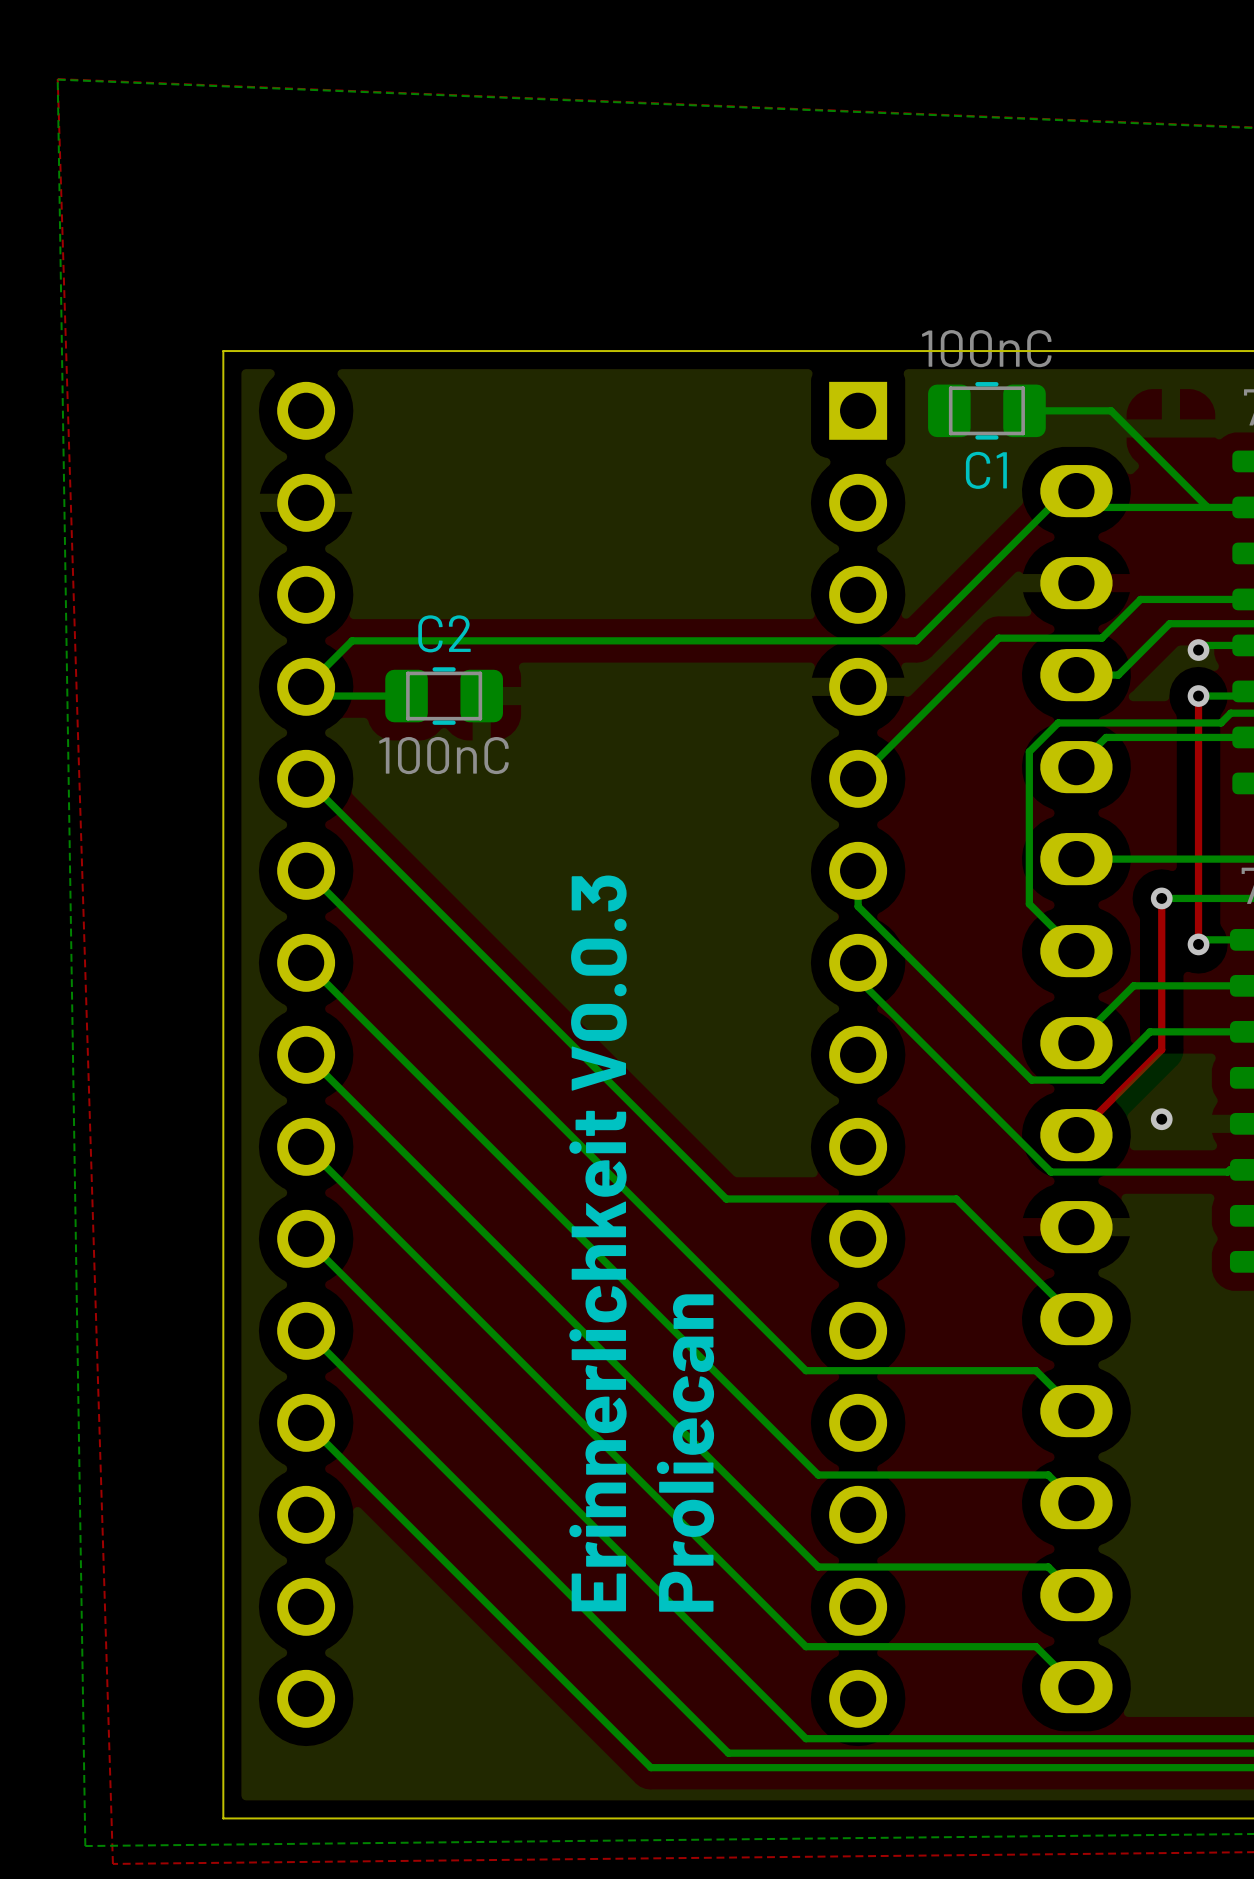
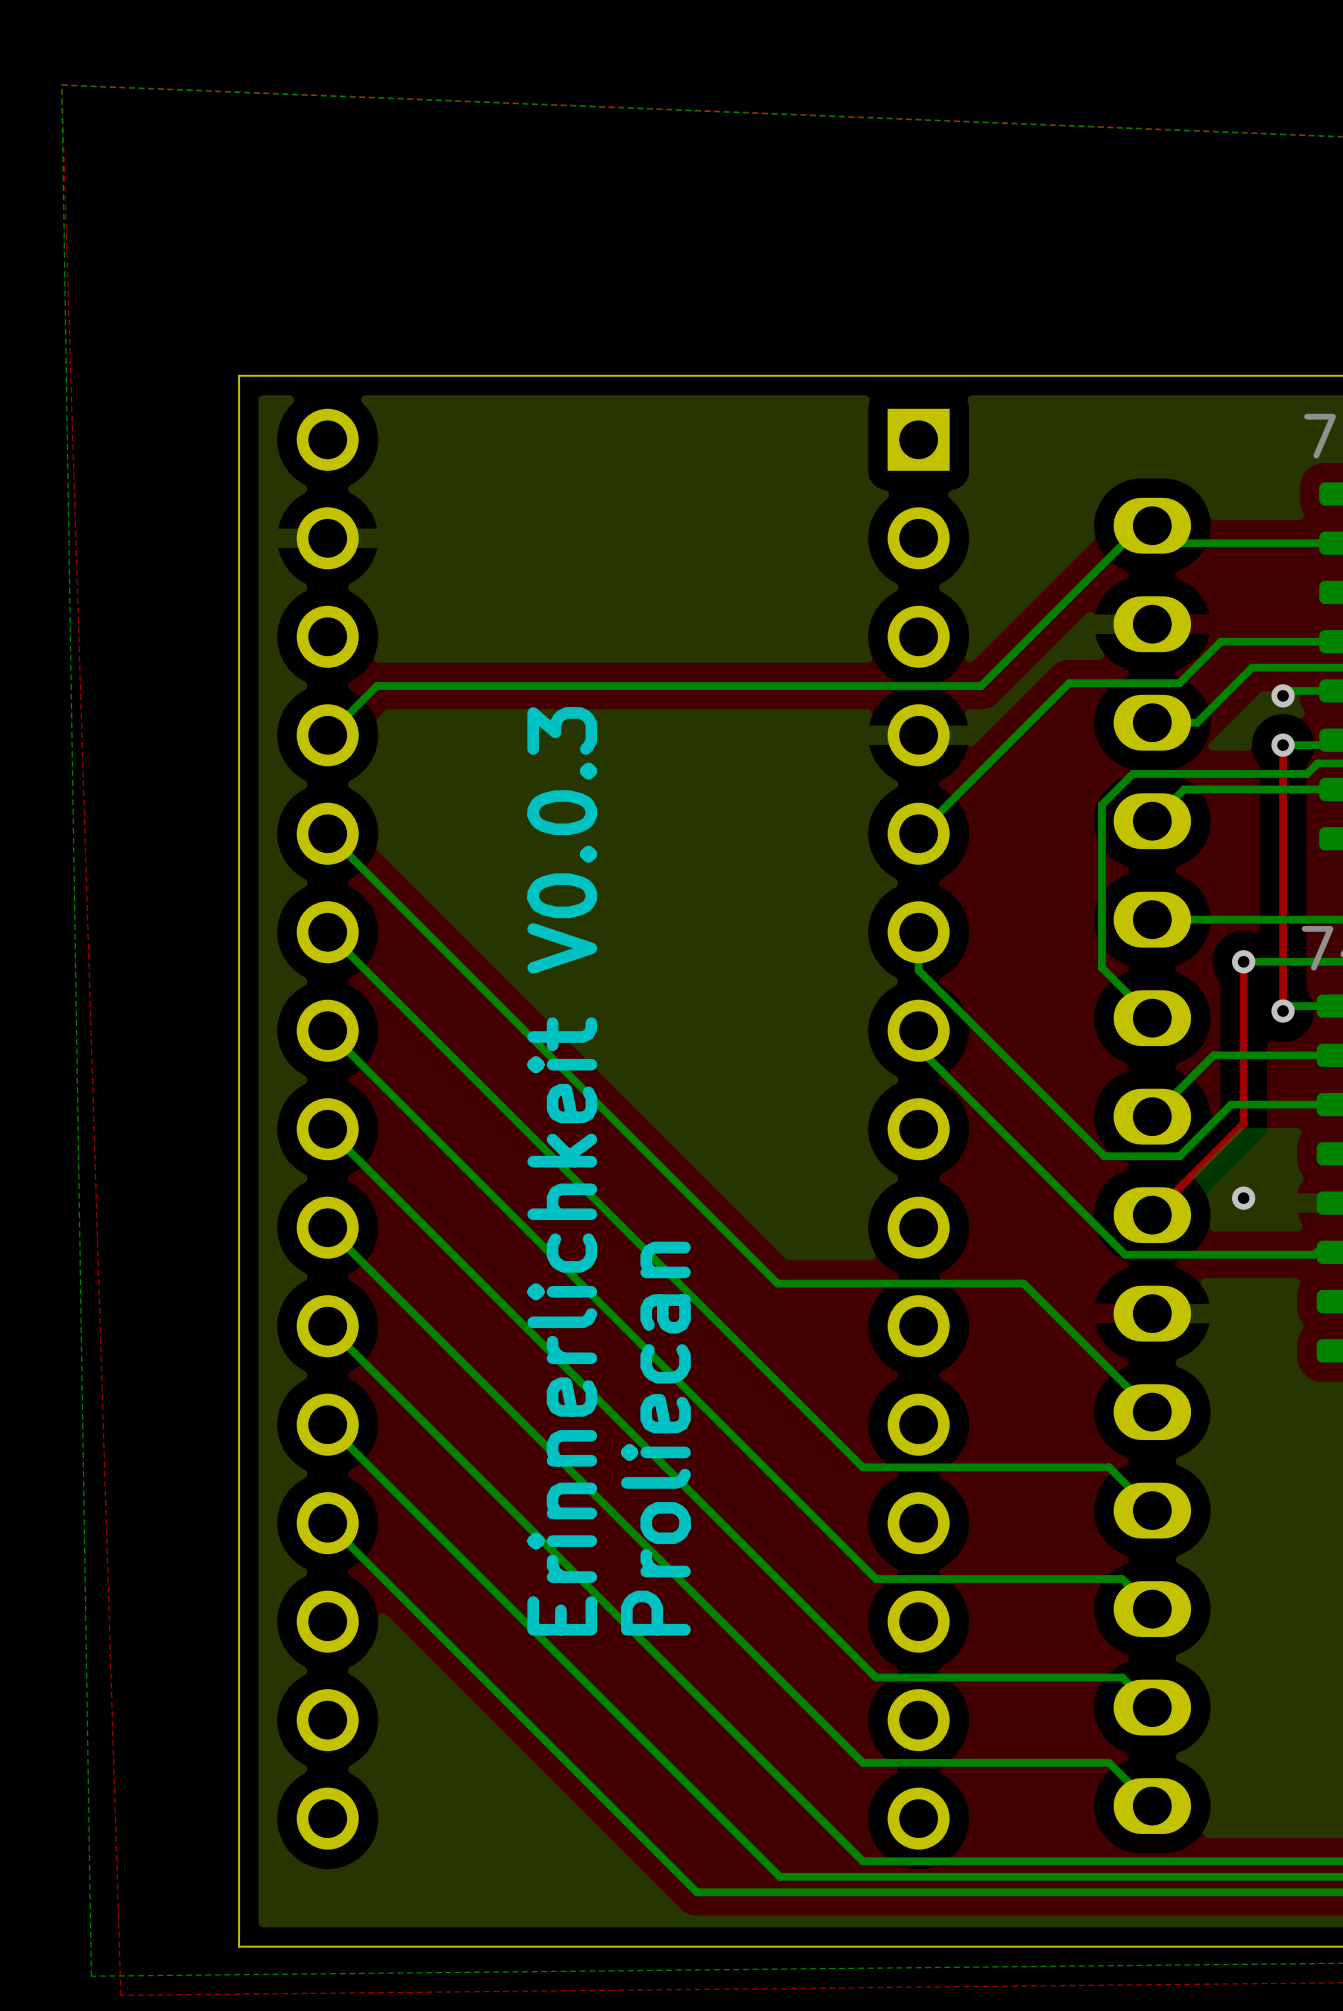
C1: 100nC (986, 410) -> none
bottom track: (1015, 410) (1111, 410) (1207, 507) -> none
bottom track: (306, 686) (315, 696) (406, 696) -> none
C2: 100nC (444, 696) -> none
text position: Erinnerlichkeit V0.0.3 (598, 1243) -> Erinnerlichkeit V0.0.3 (562, 1171)
text position: Proliecan (685, 1453) -> Proliecan (655, 1438)

